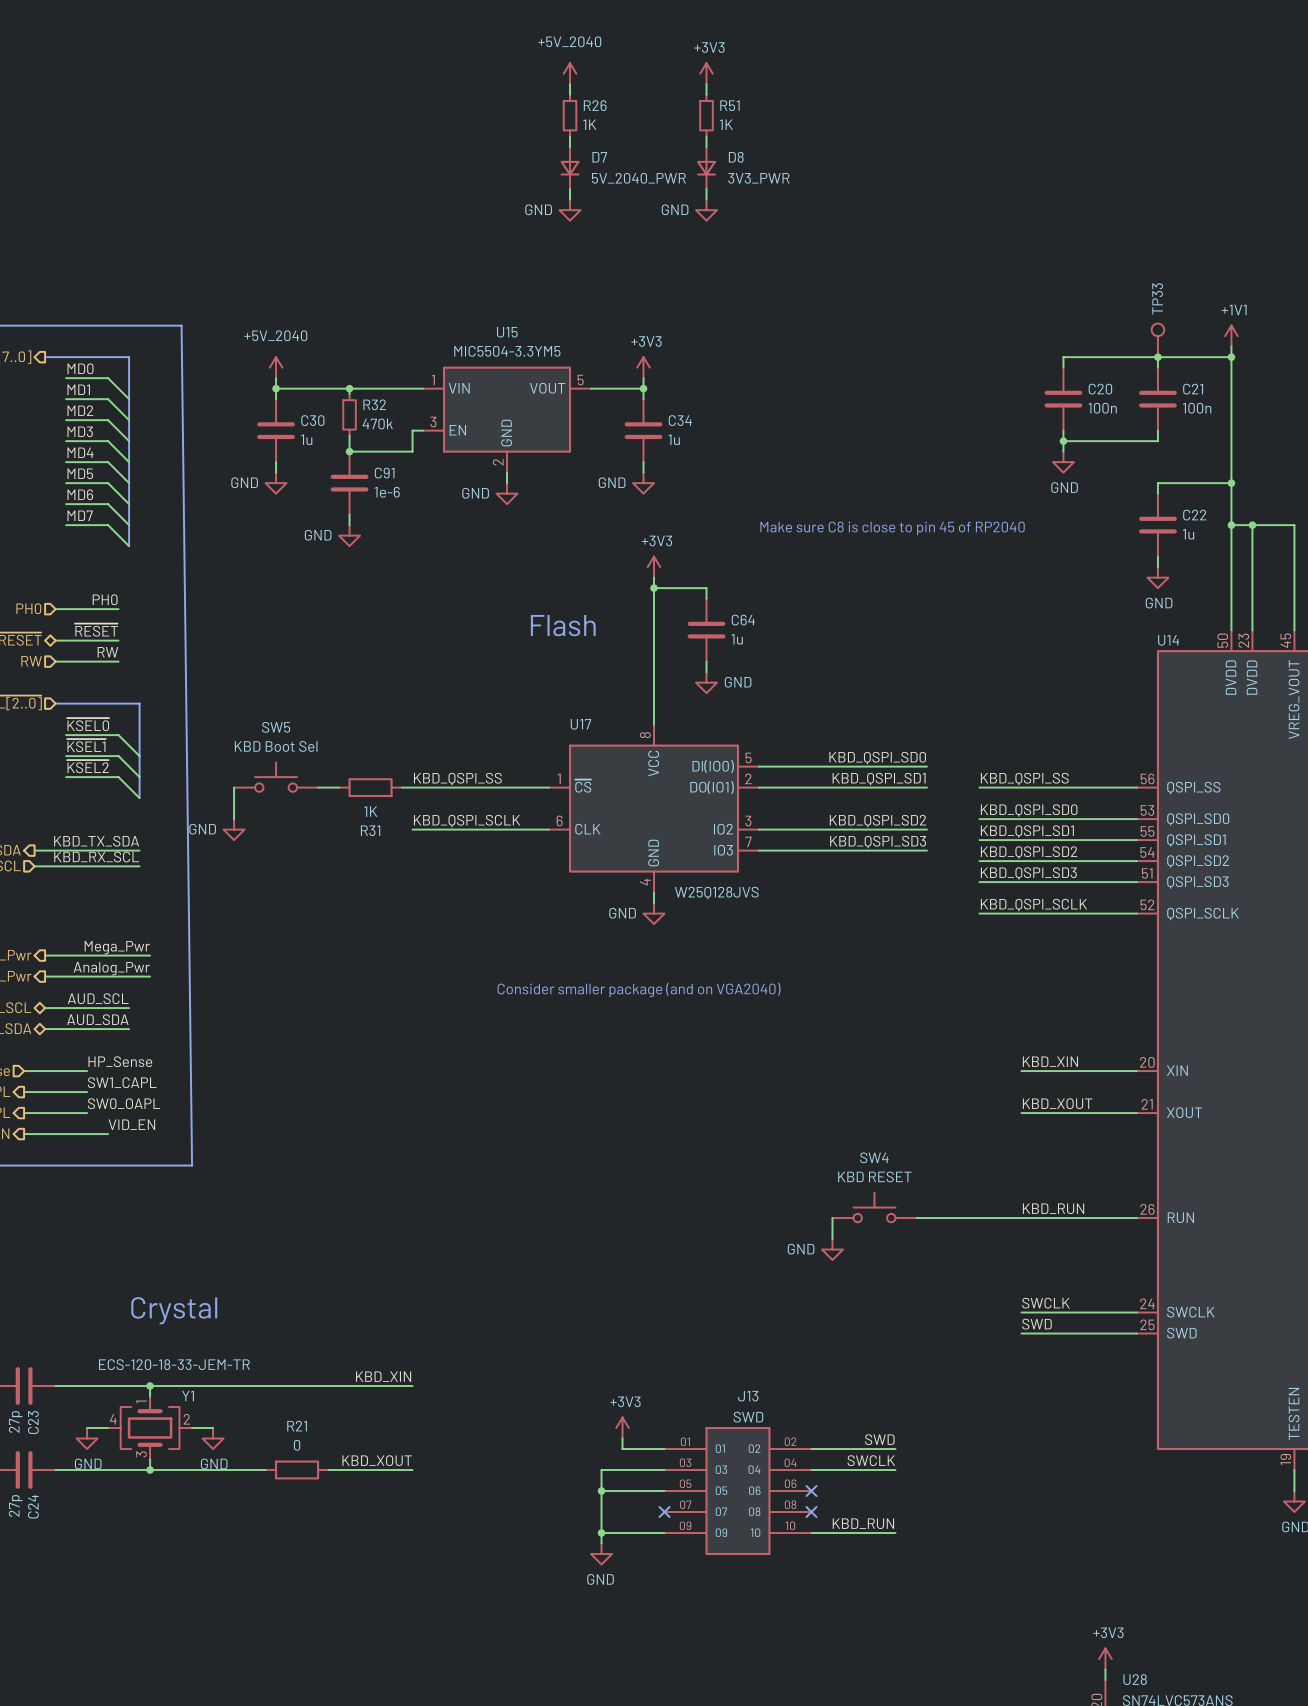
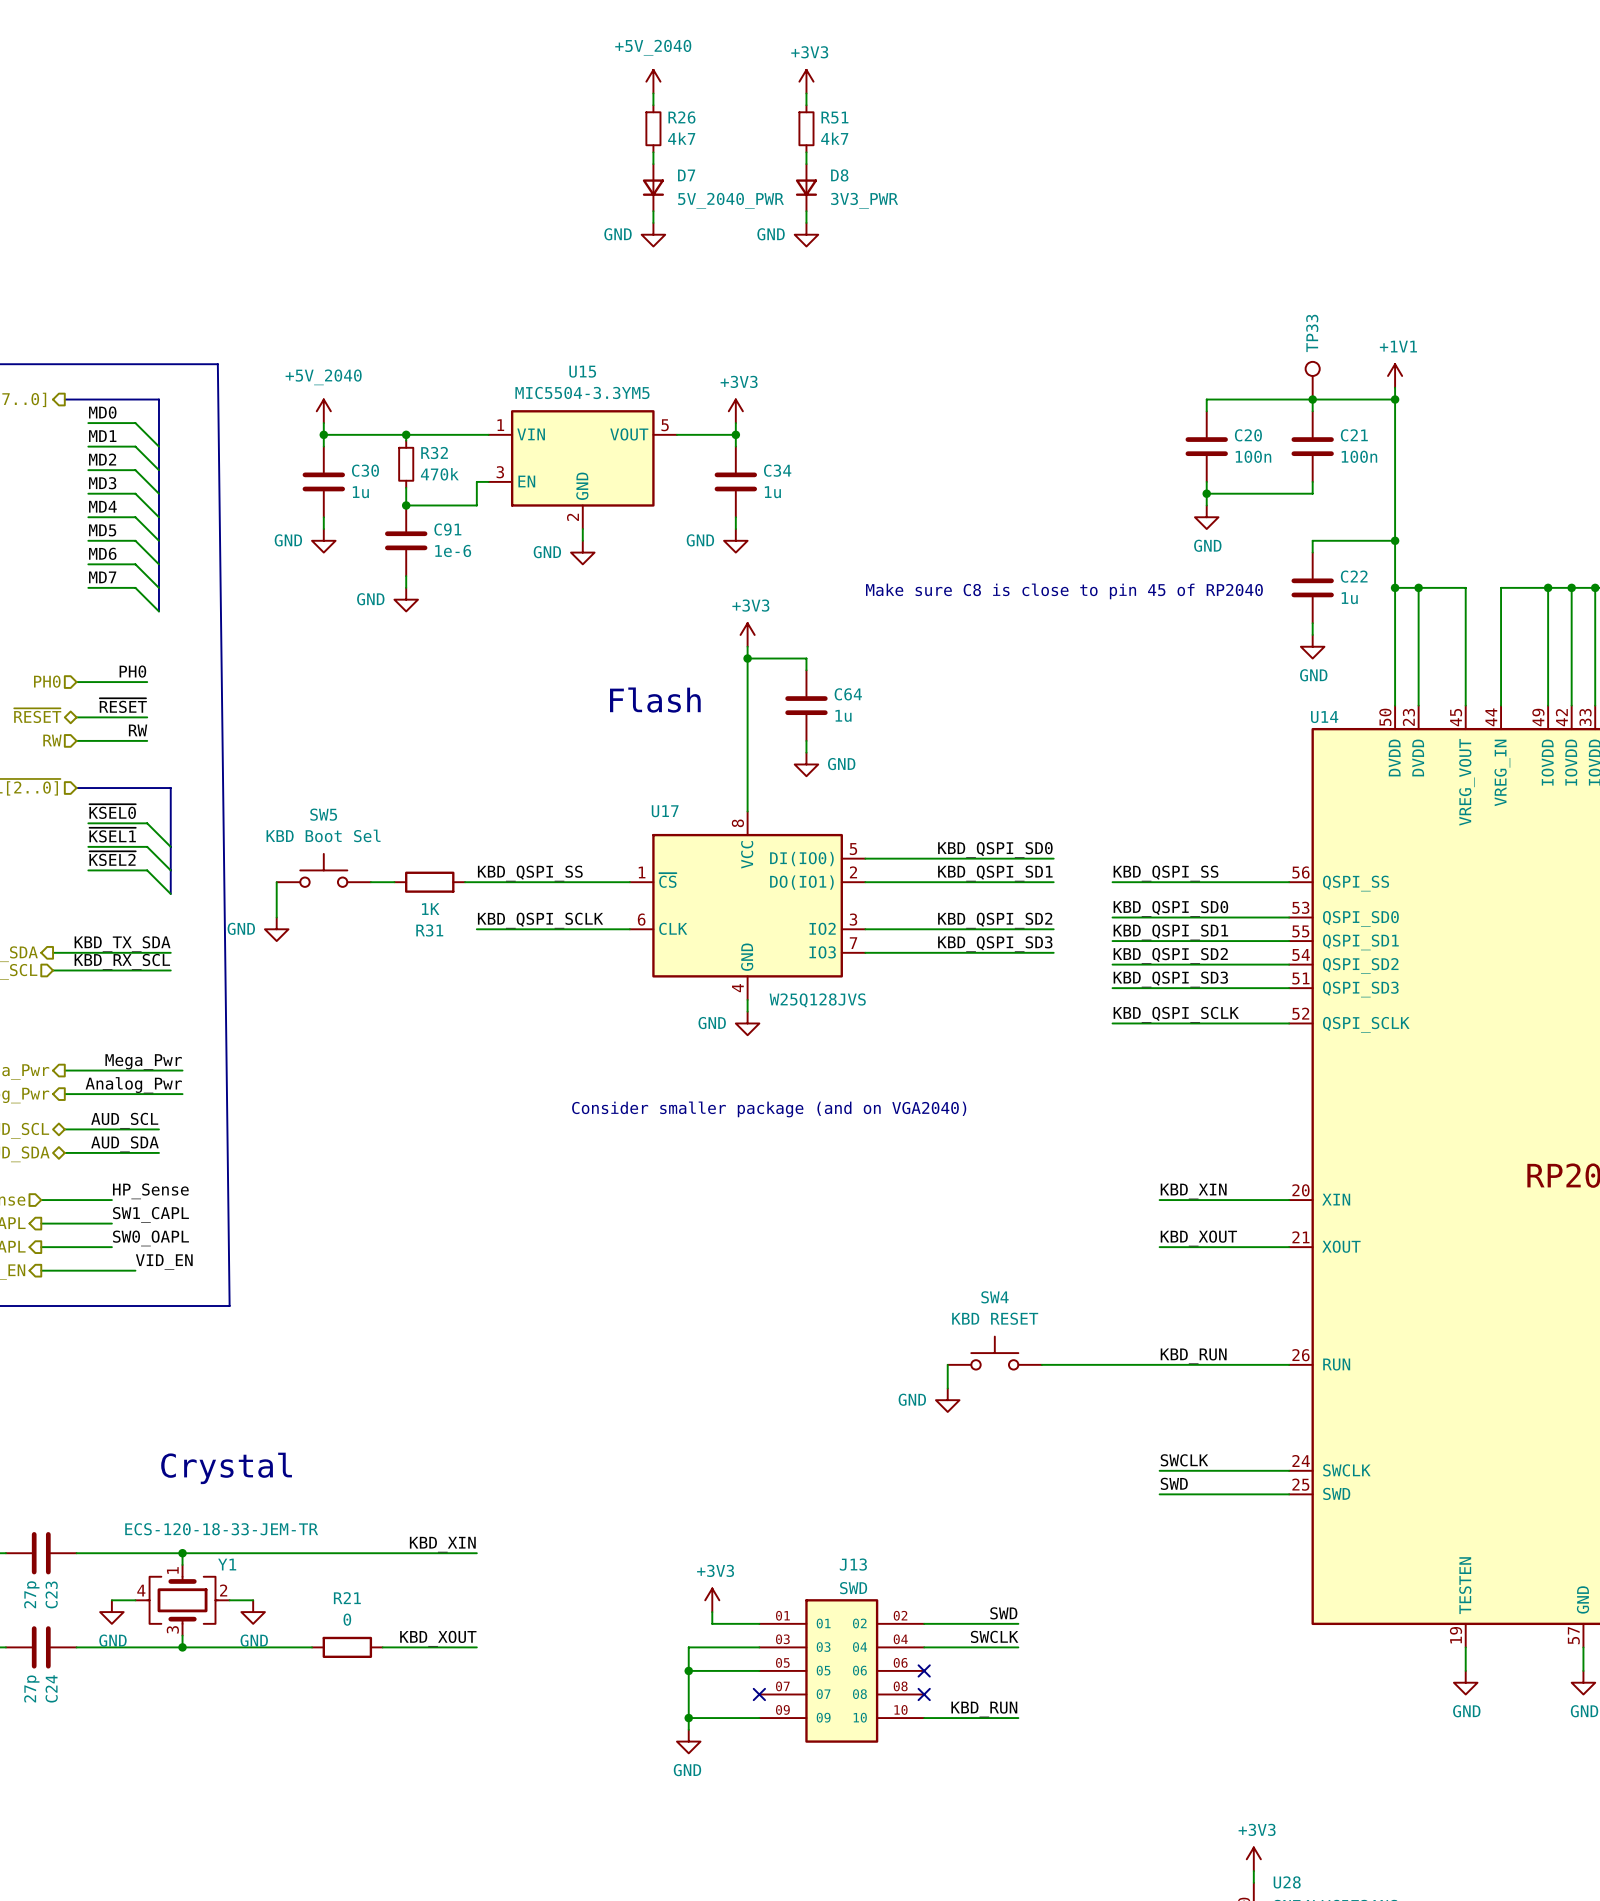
R26 value: 1K (589, 124) -> 4k7 (681, 138)
R51 value: 1K (726, 124) -> 4k7 (834, 138)

